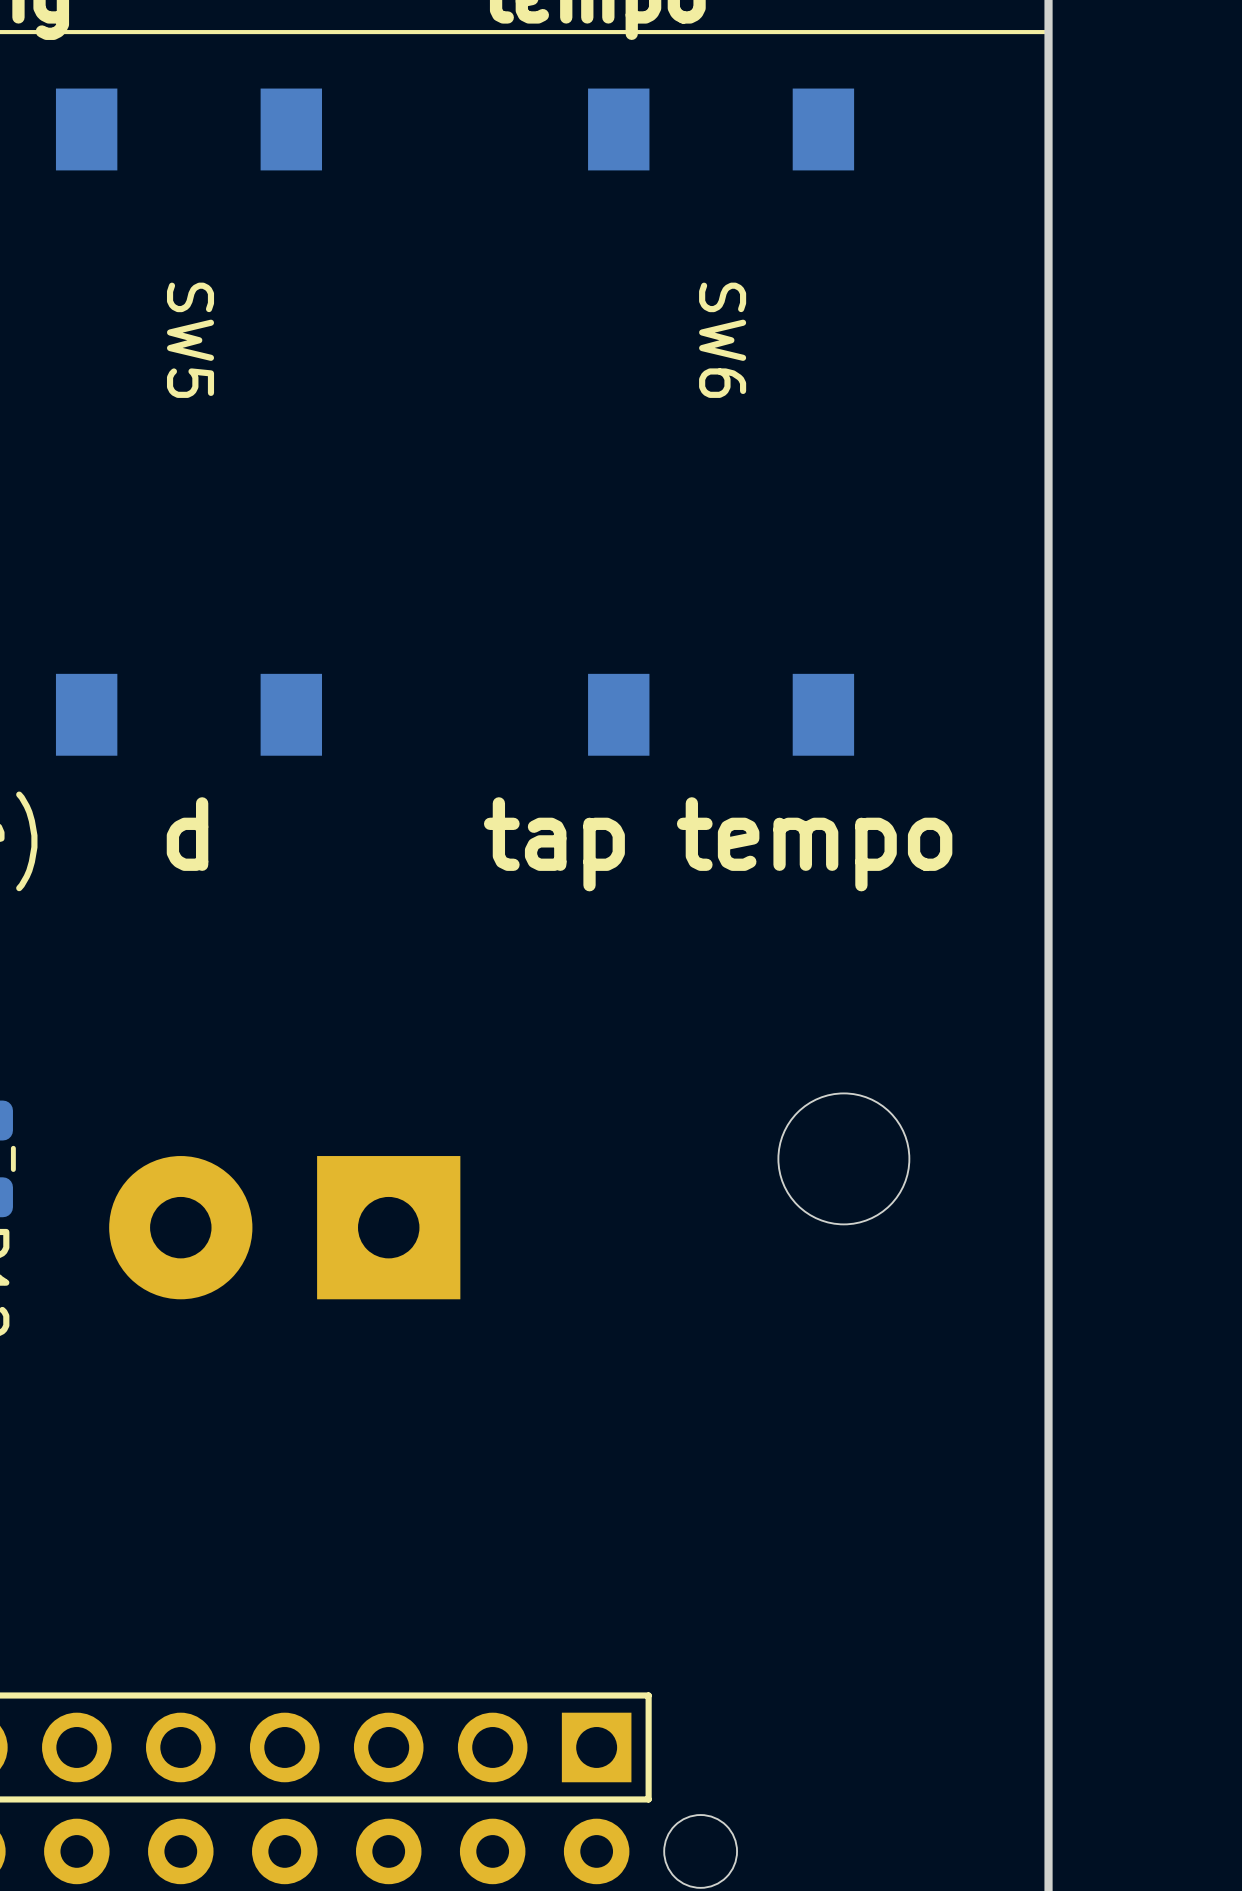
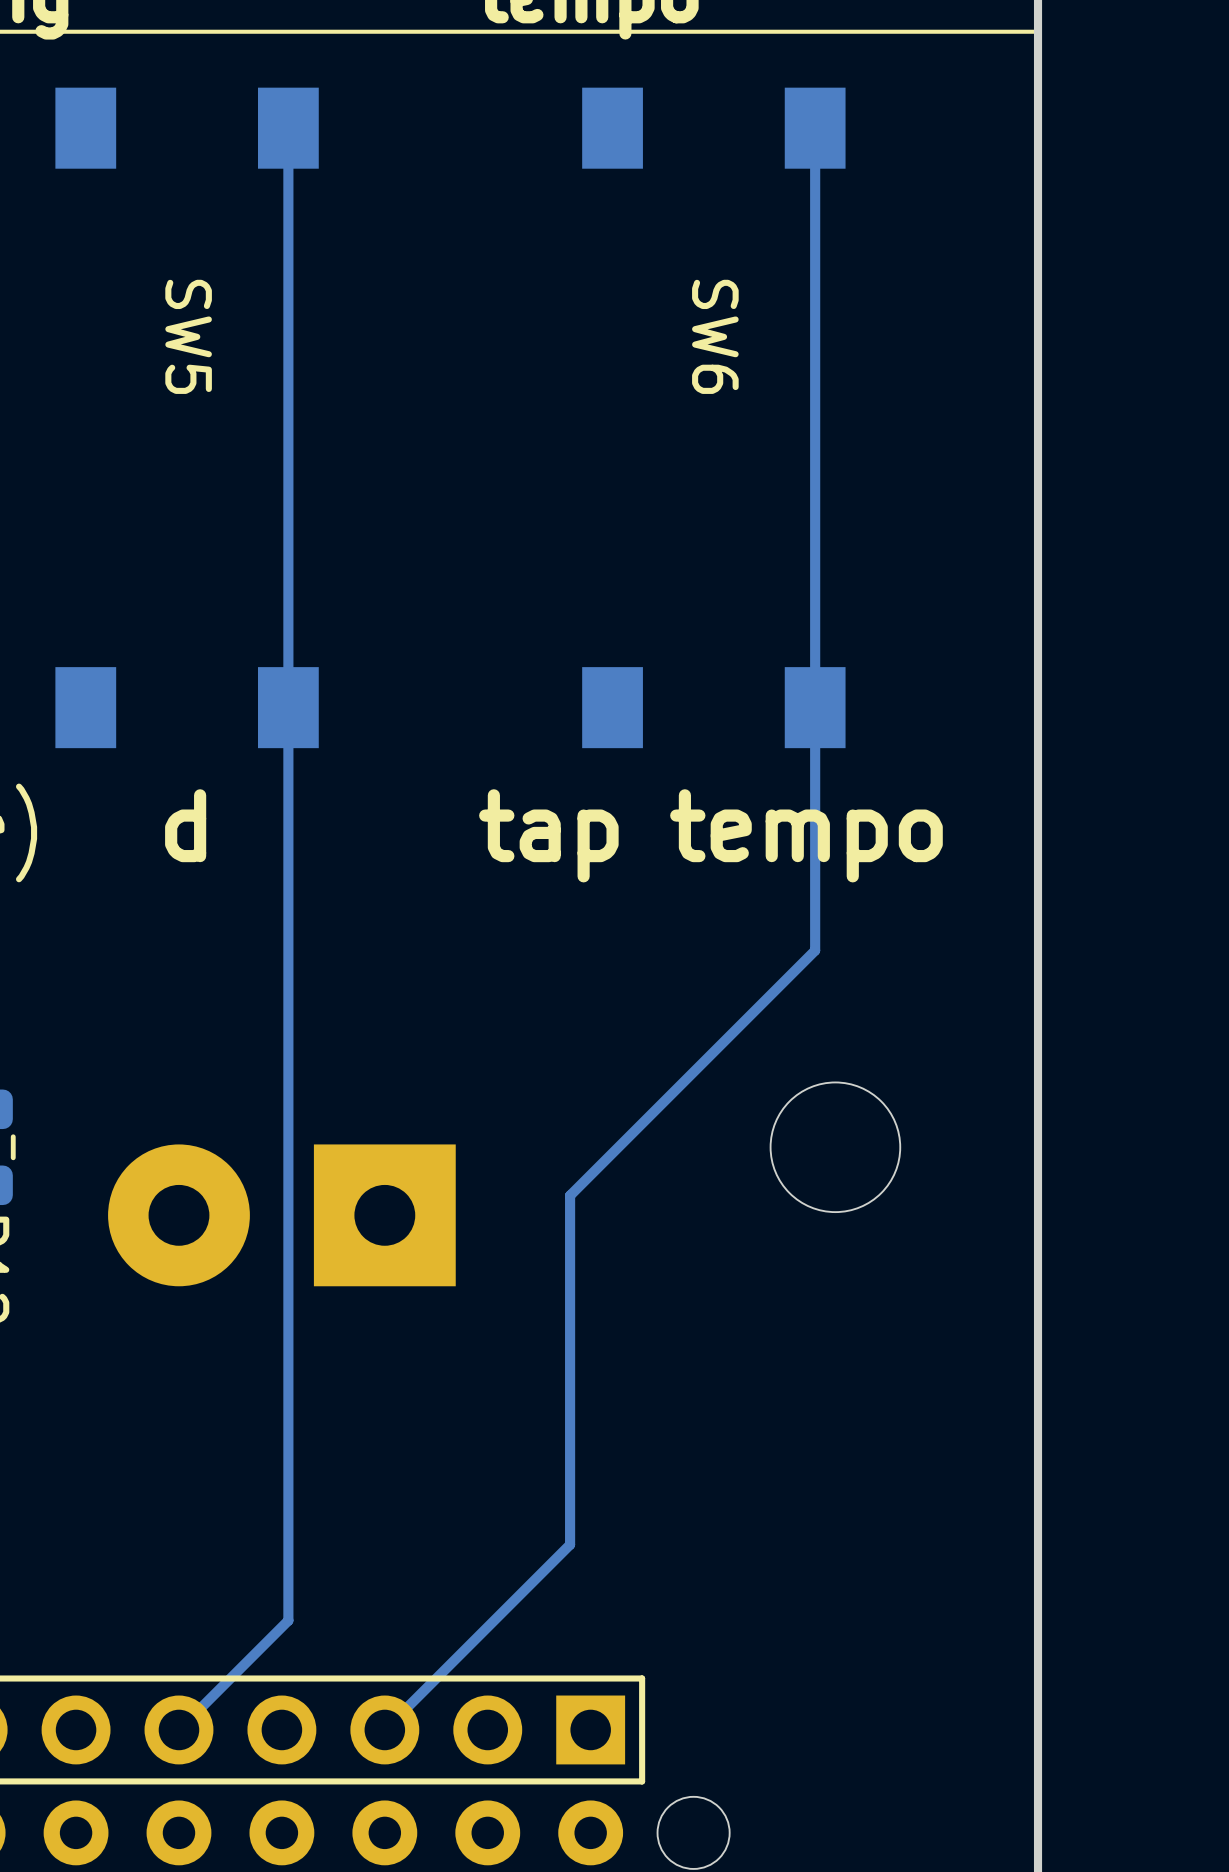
track: none -> (288, 128) (288, 1620) (178, 1729)
track: none -> (815, 128) (815, 950) (570, 1195) (570, 1544) (384, 1729)

